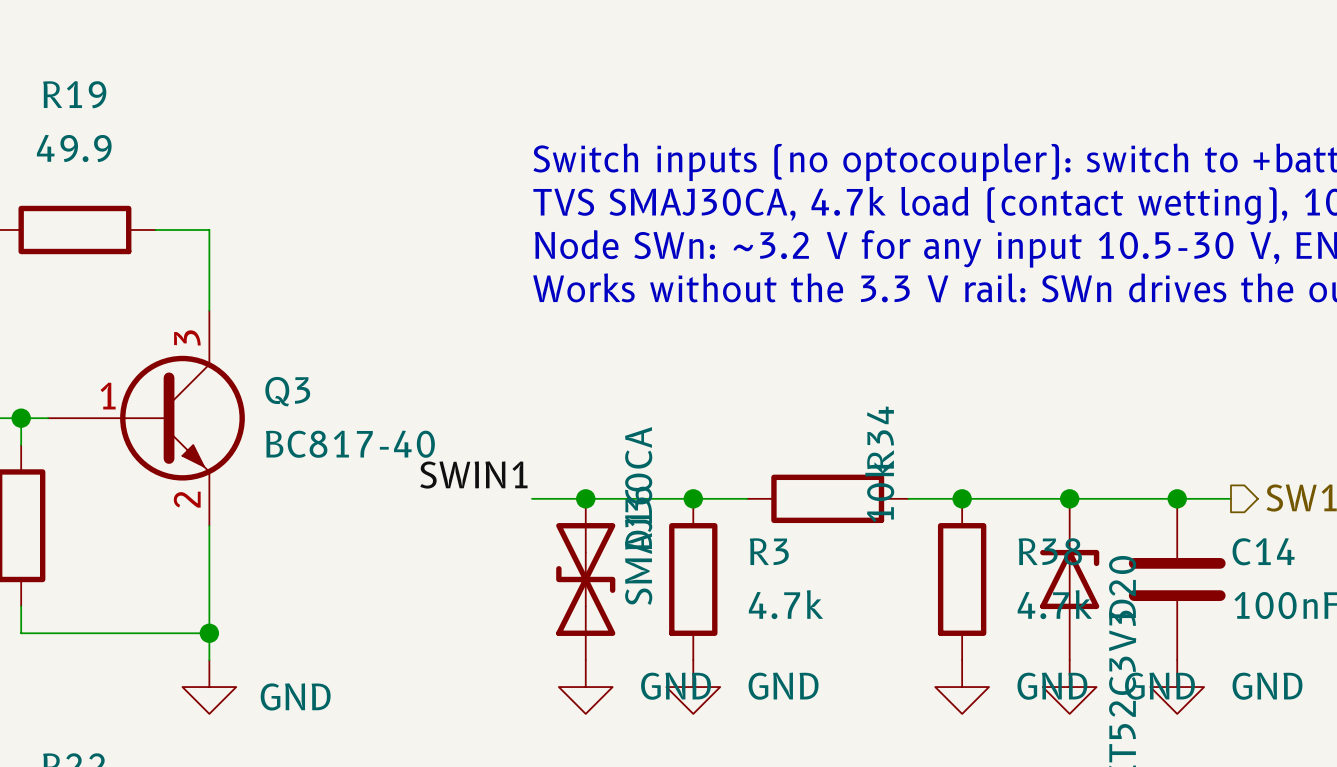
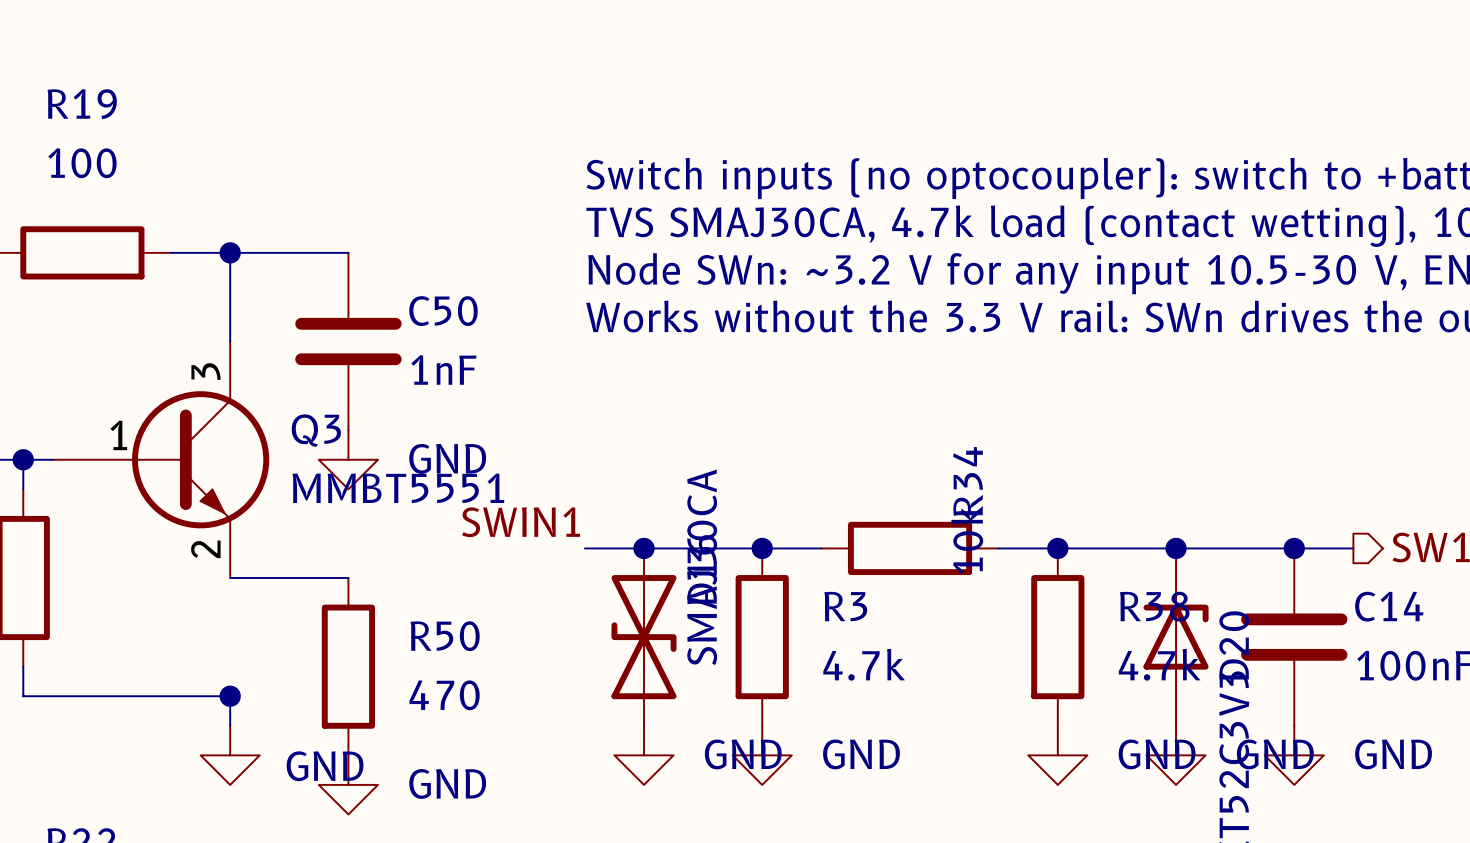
R19 value: 49.9 (74, 148) -> 100 (82, 163)
wire: none -> (230, 252) (348, 252)
junction: none -> (230, 252)
C50: none -> 1nF (348, 341)
power symbol: none -> GND (348, 459)
Q3 value: BC817-40 (350, 444) -> MMBT5551 (398, 488)
wire: (209, 525) (209, 633) -> (230, 578) (348, 578)
R50: none -> 470 (348, 666)
power symbol: none -> GND (348, 784)

